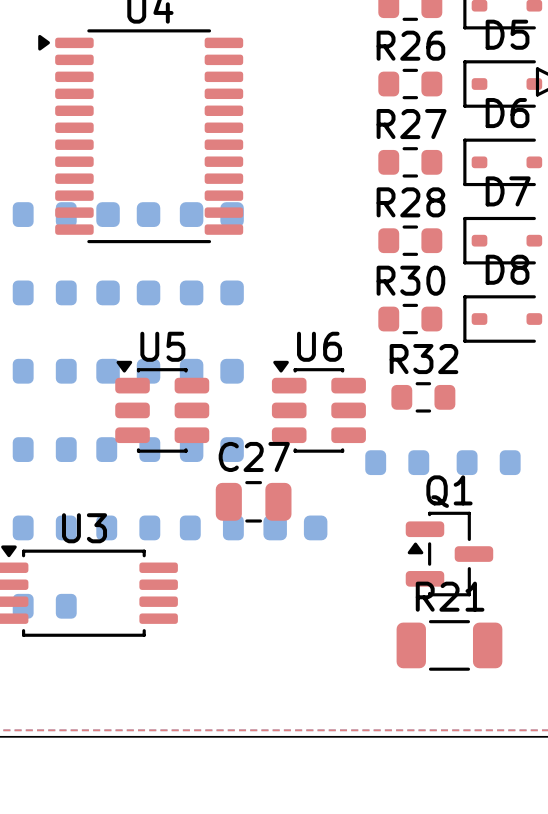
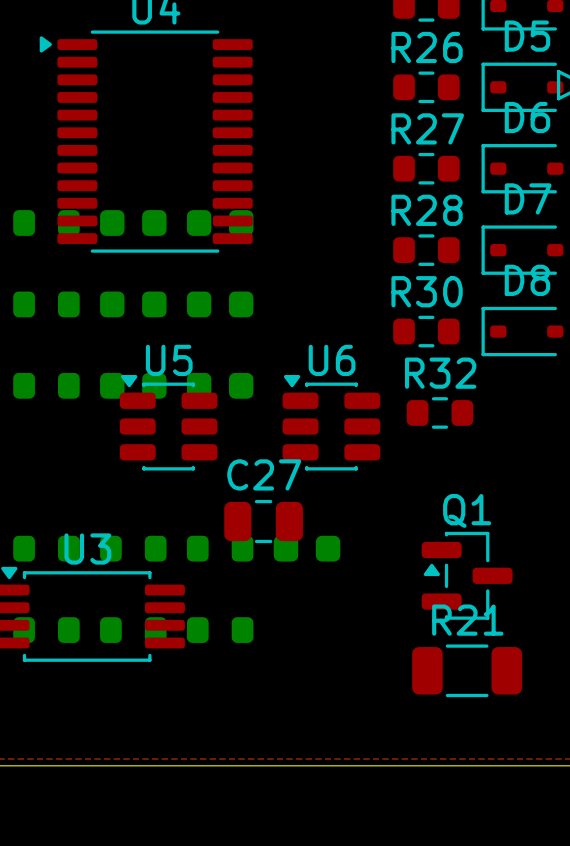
part: (44, 449) -> none
part: (128, 449) -> none
part: (211, 449) -> none
part: (397, 462) -> none
part: (488, 462) -> none
part: none -> (133, 630)
part: none -> (220, 630)

